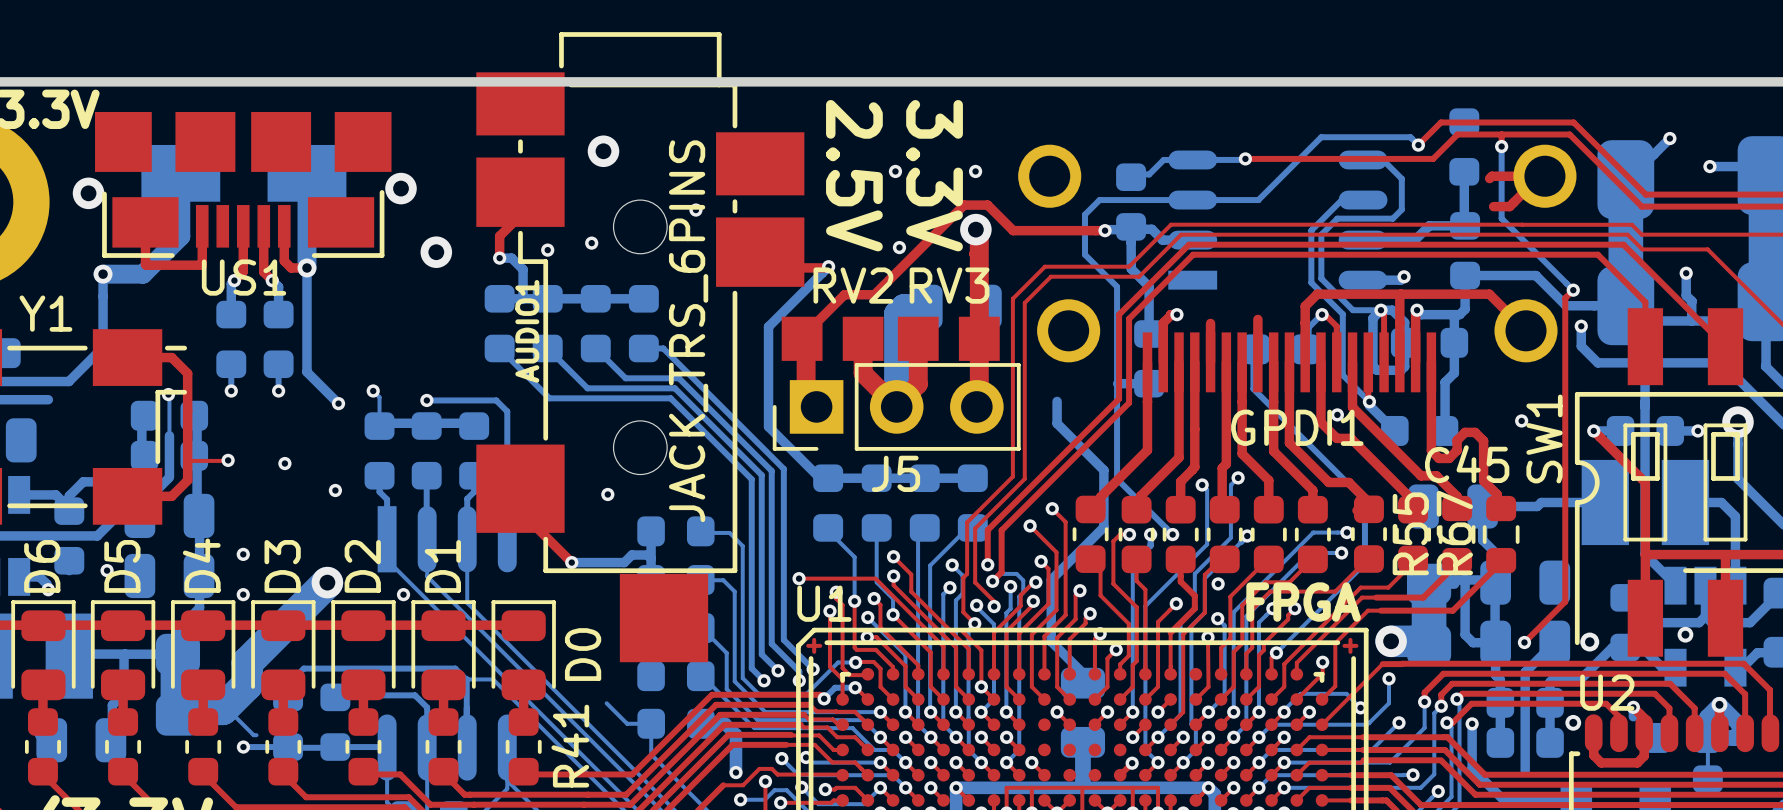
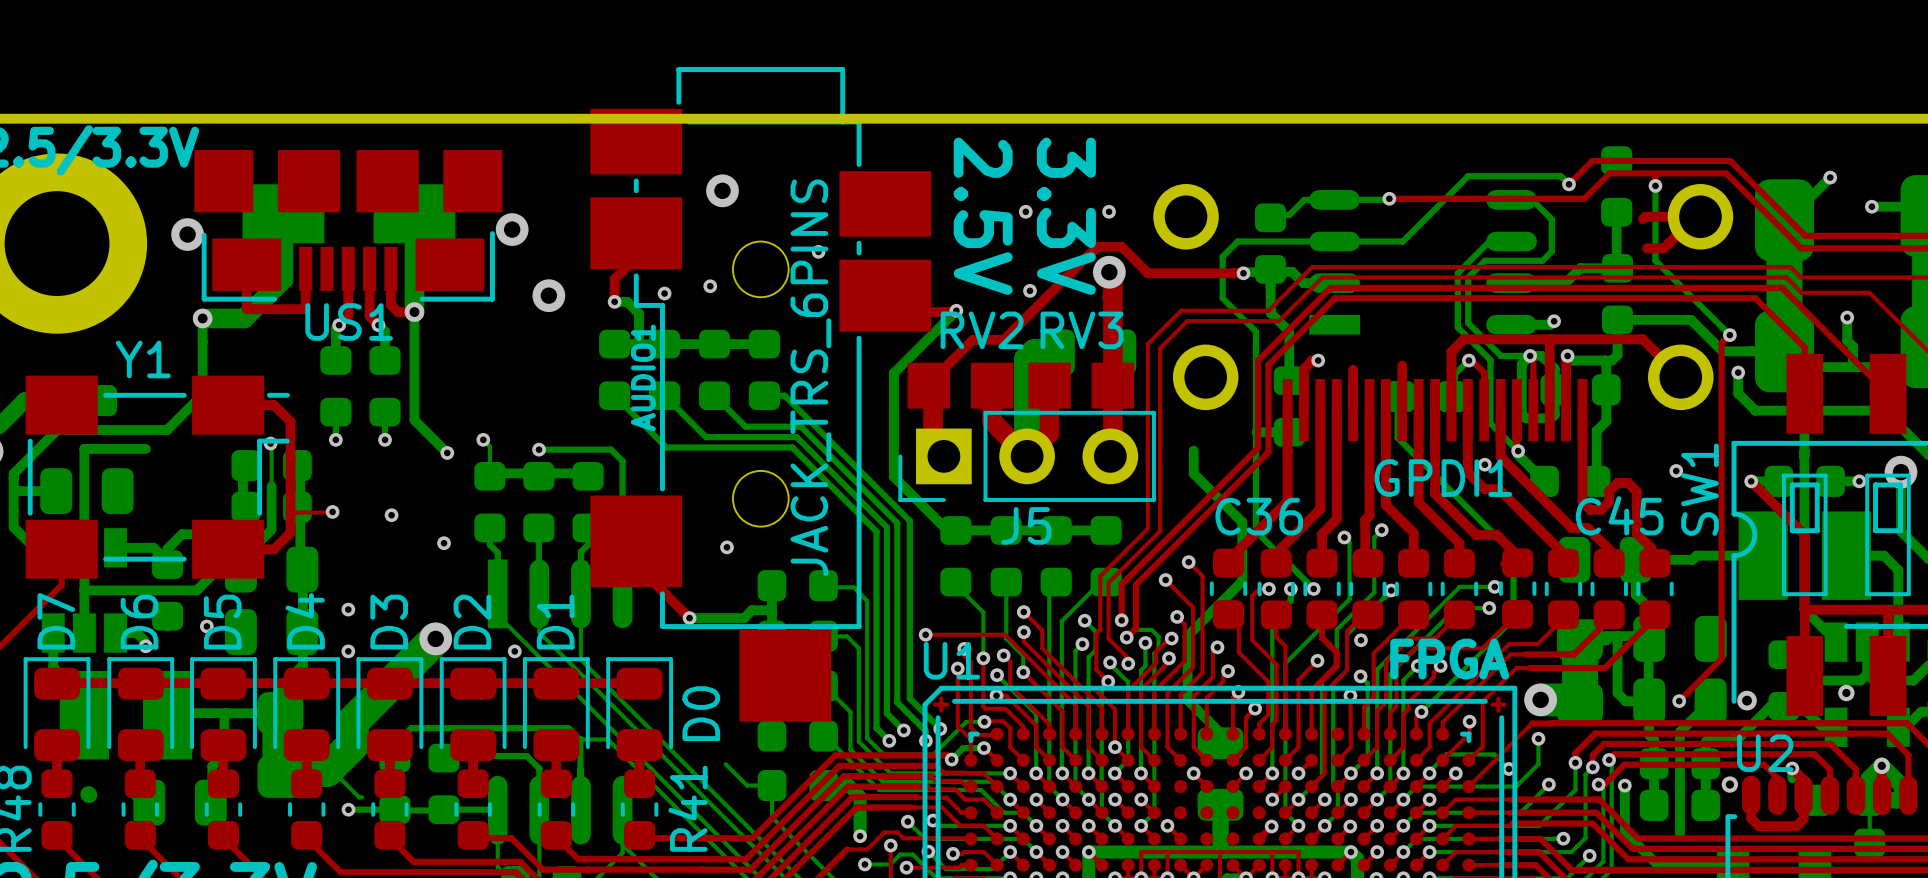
R55: (1457, 534) -> none
C36: none -> (1609, 588)
R67: (1501, 534) -> none
part: none -> (1654, 588)

